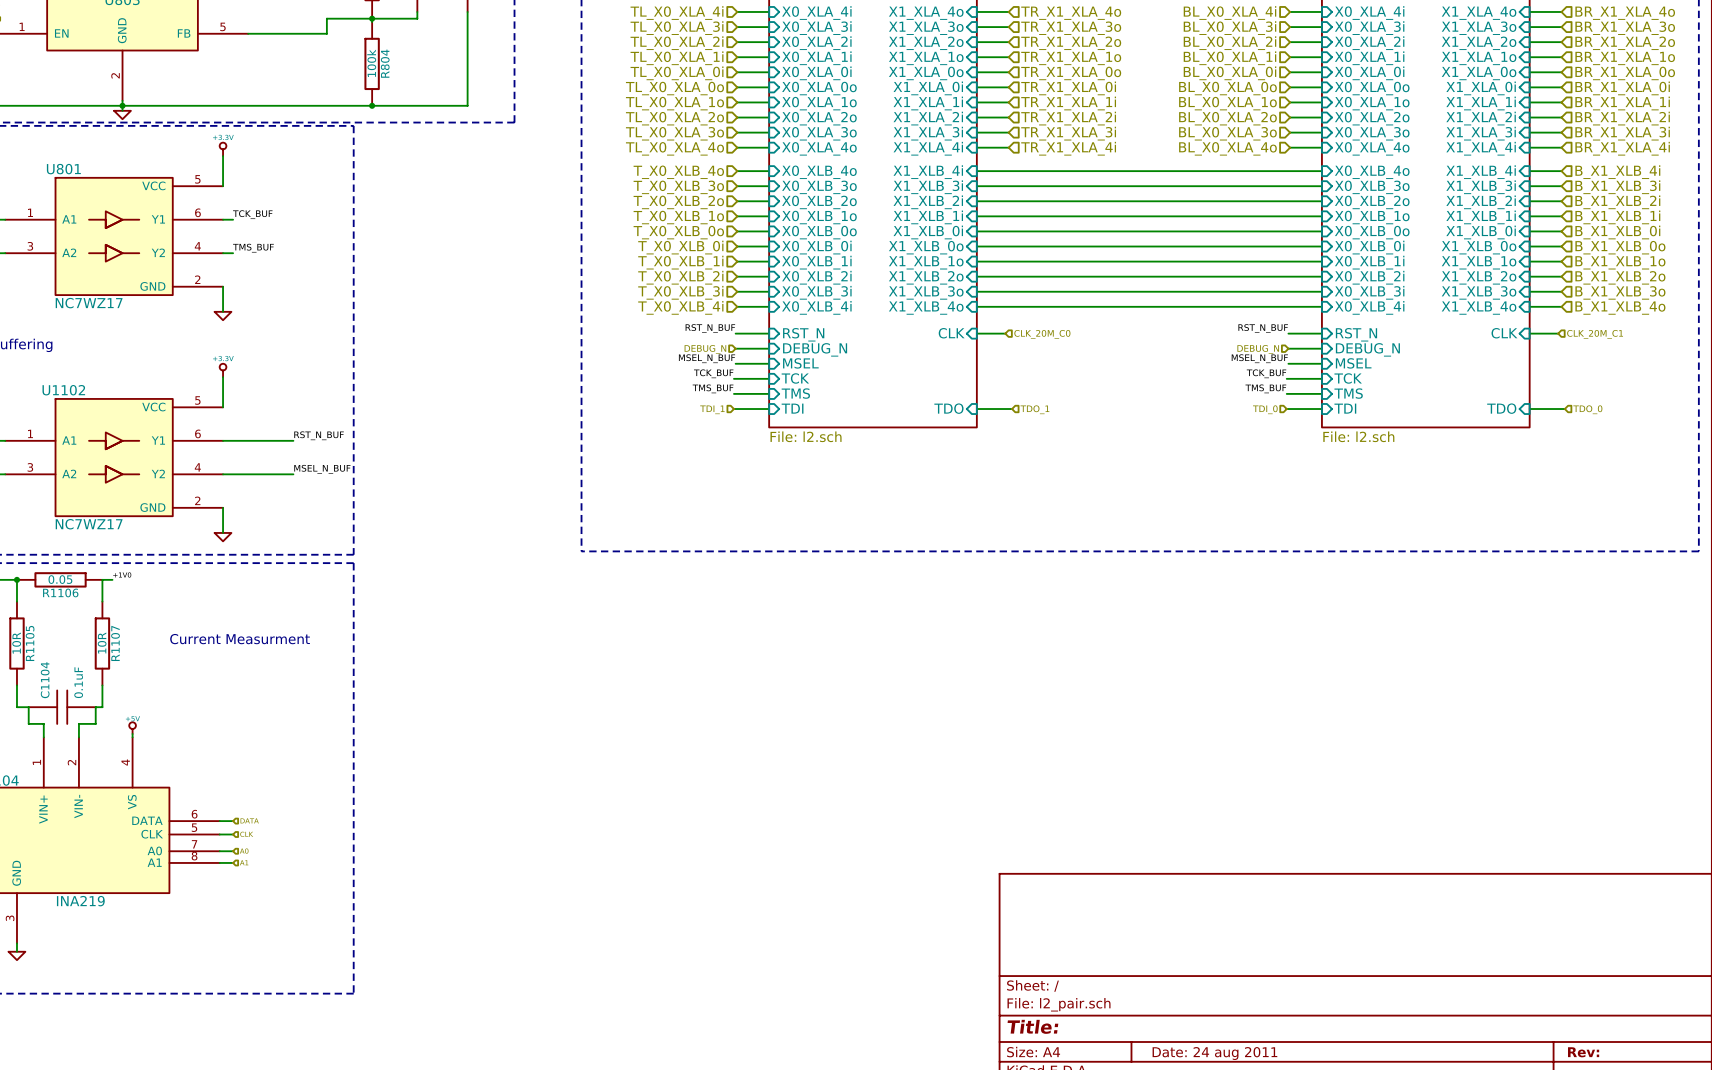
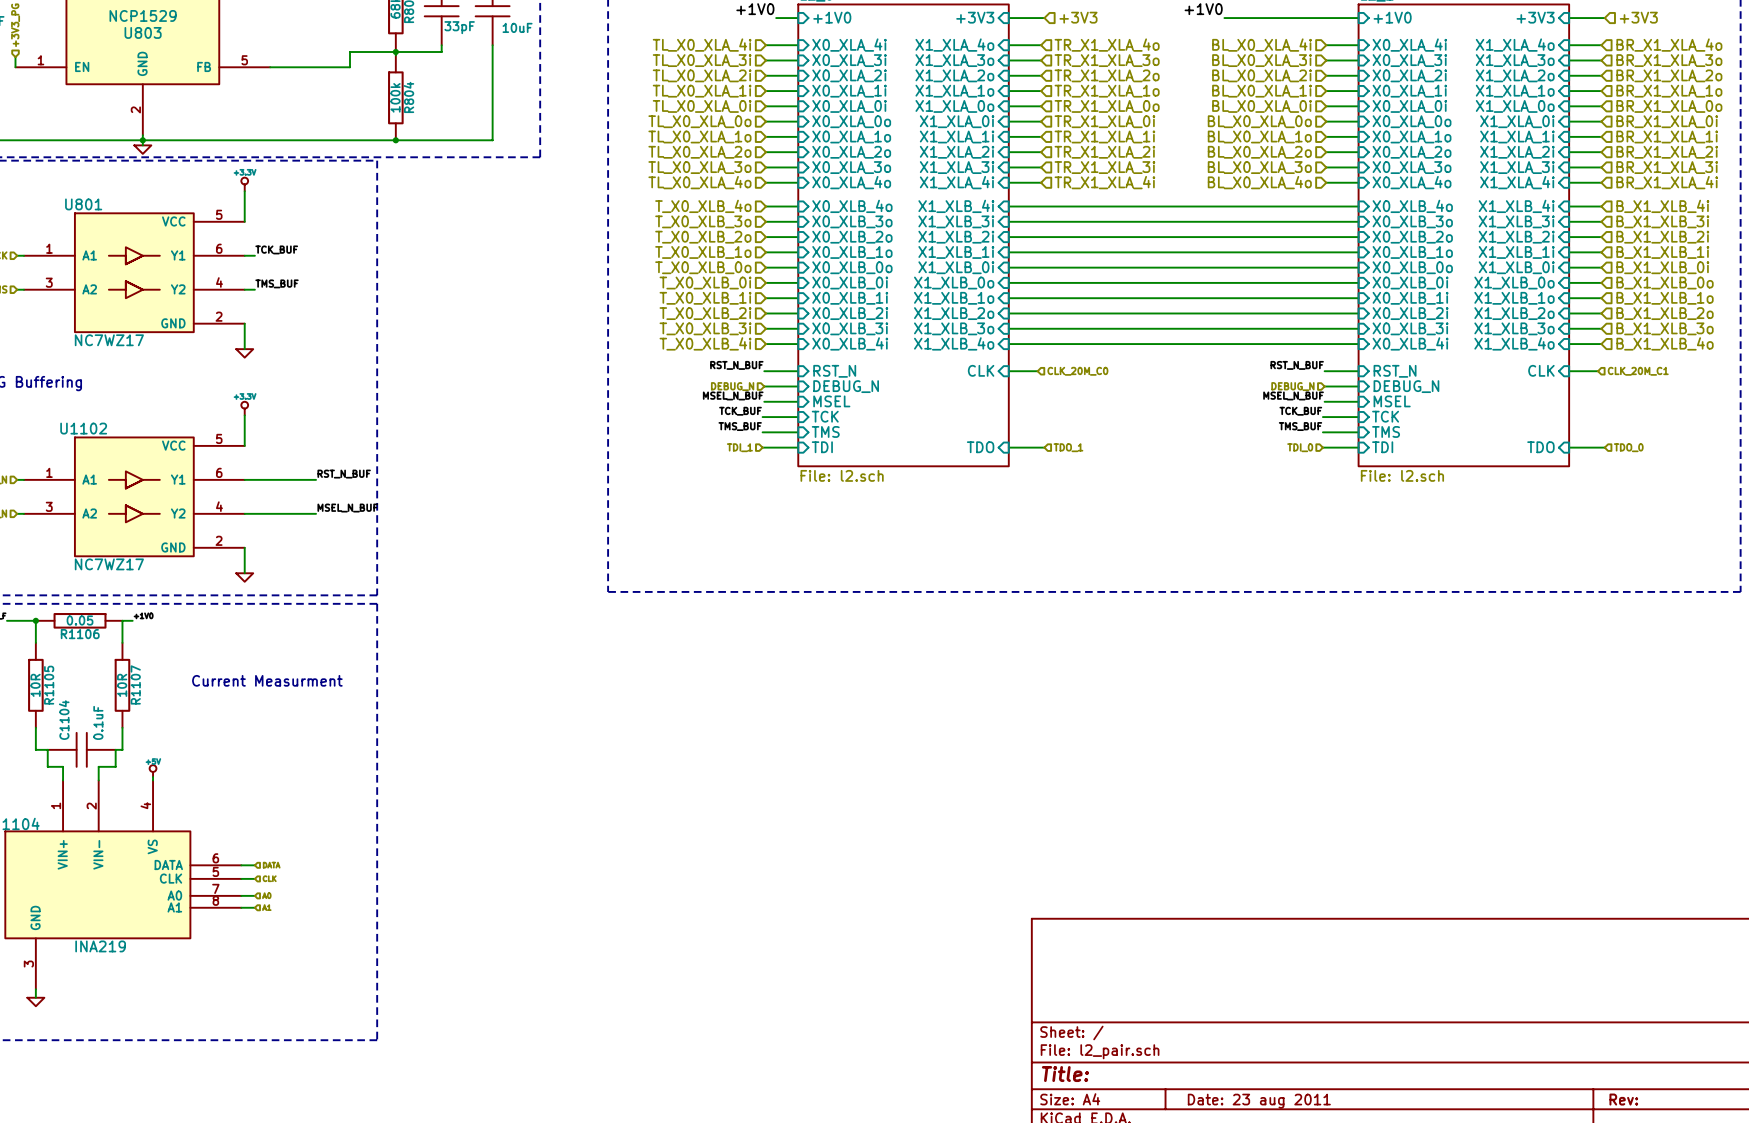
title block: Date: 24 aug 2011 (1214, 1053) -> Date: 23 aug 2011 (1259, 1101)

